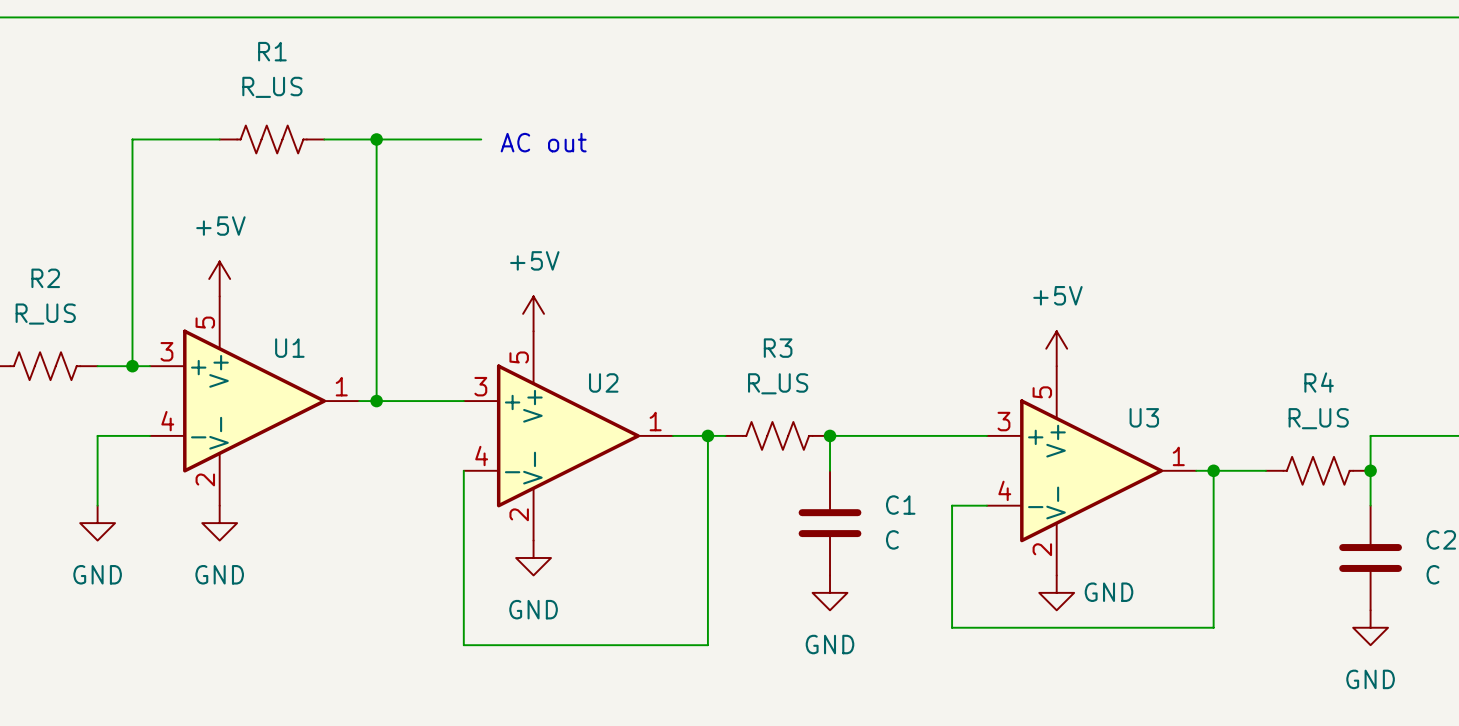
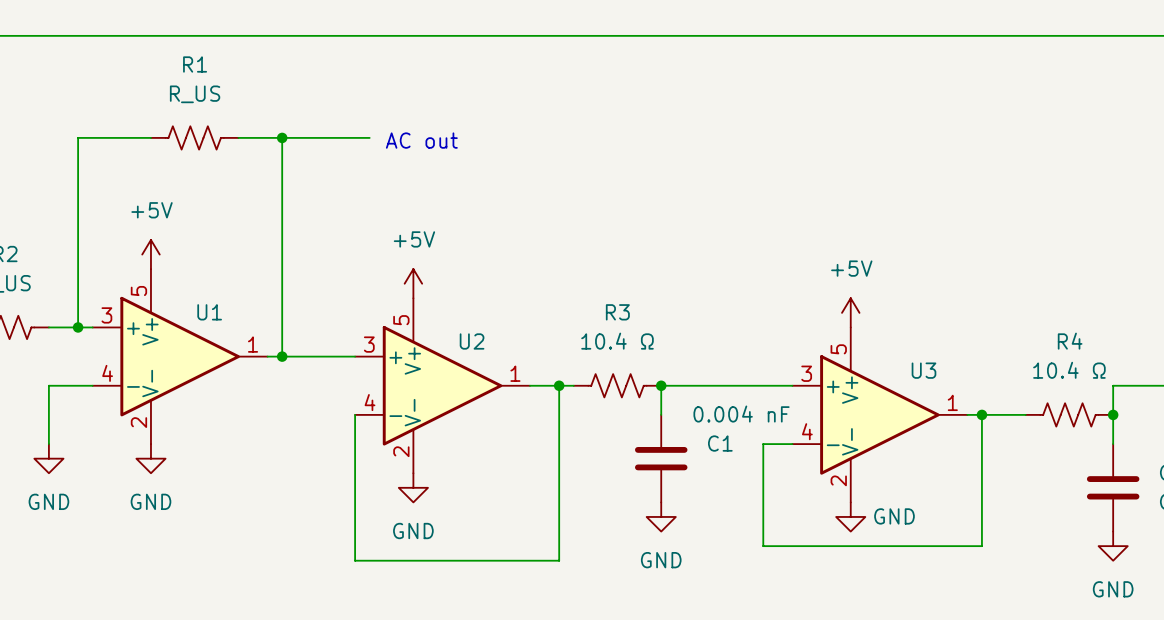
R3 value: R_US (778, 383) -> 10.4 Ω (617, 341)
R4 value: R_US (1318, 418) -> 10.4 Ω (1069, 370)
C1 value: C (892, 539) -> 0.004 nF (741, 414)

